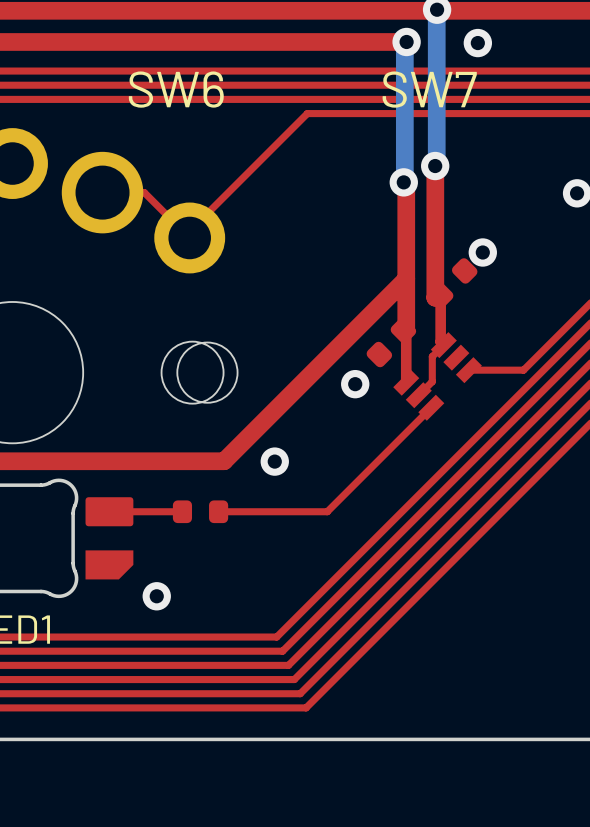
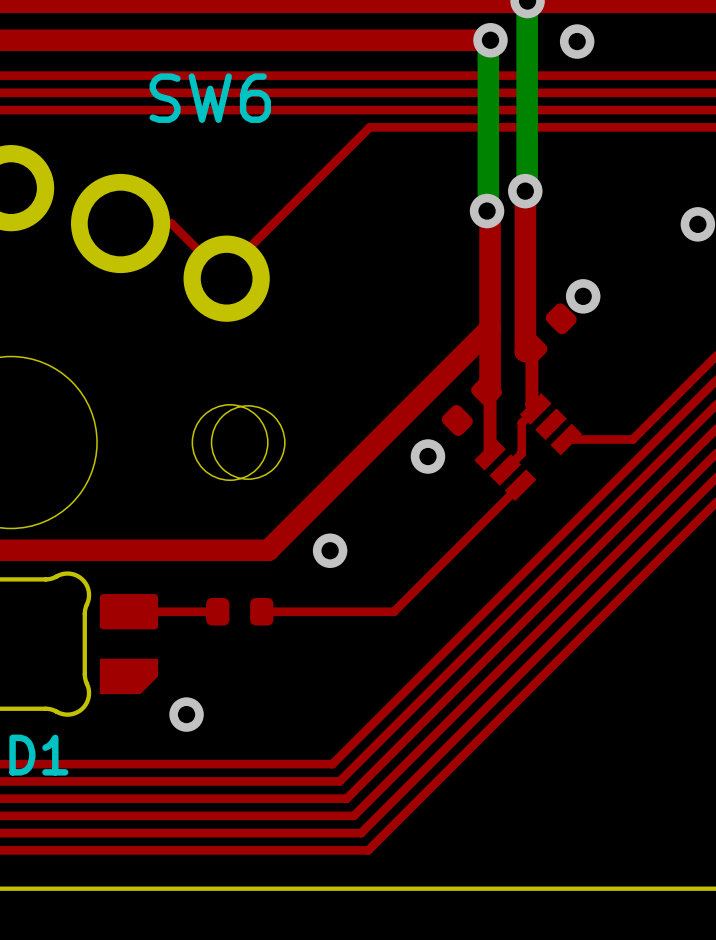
text: SW7 (429, 89) -> none

